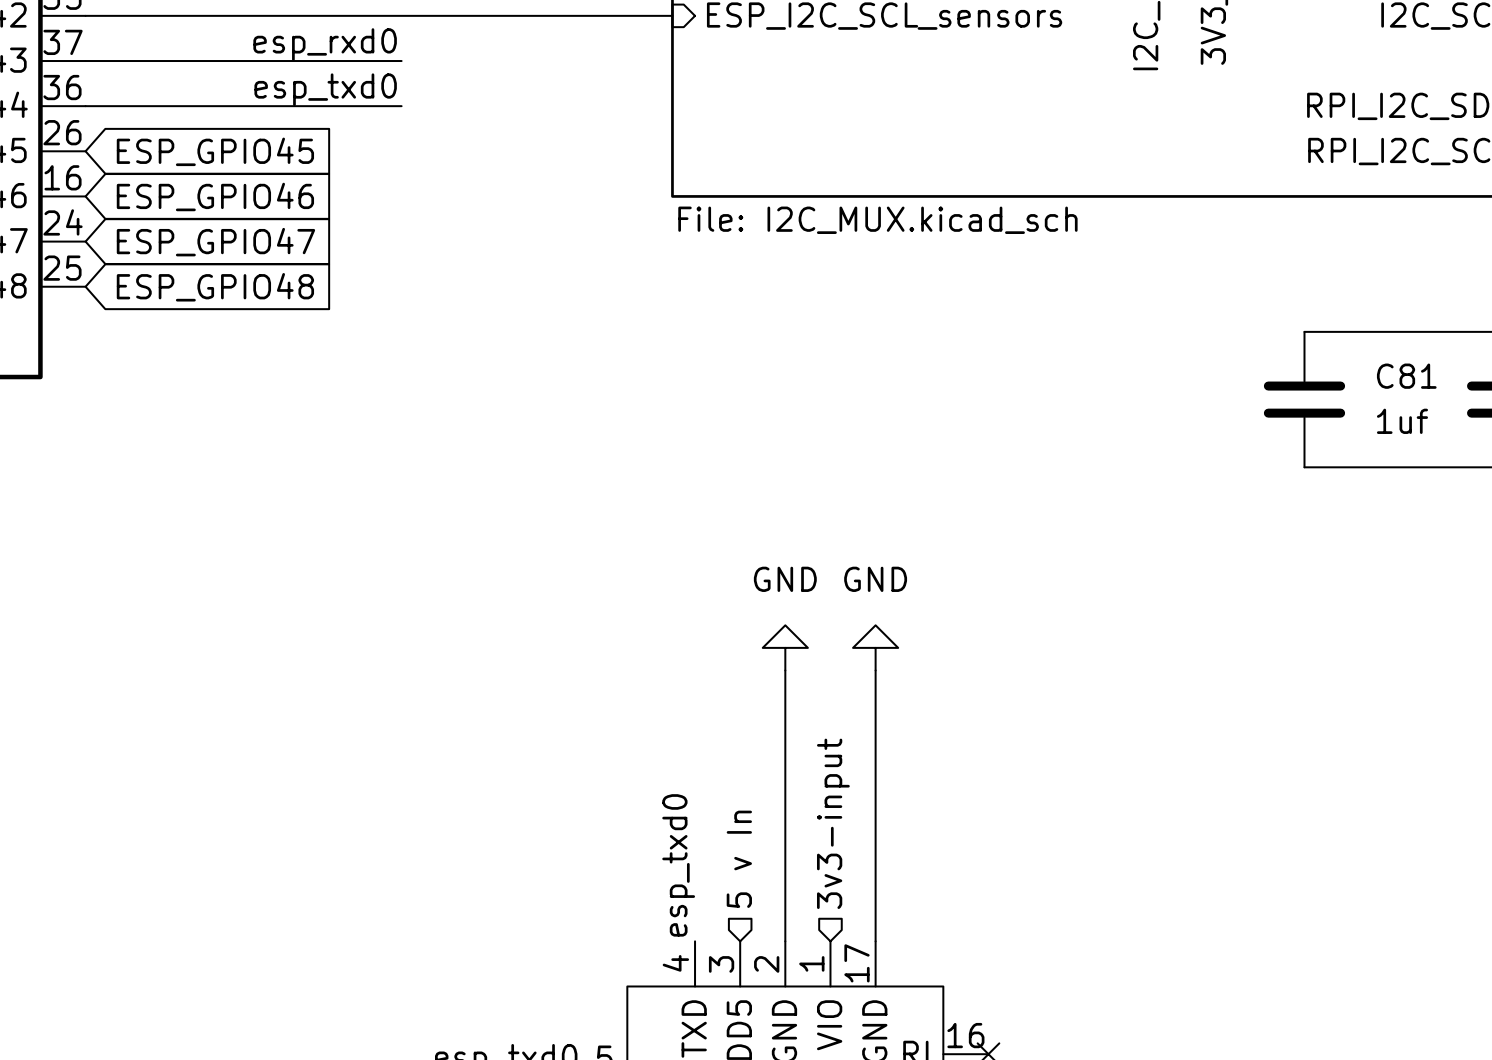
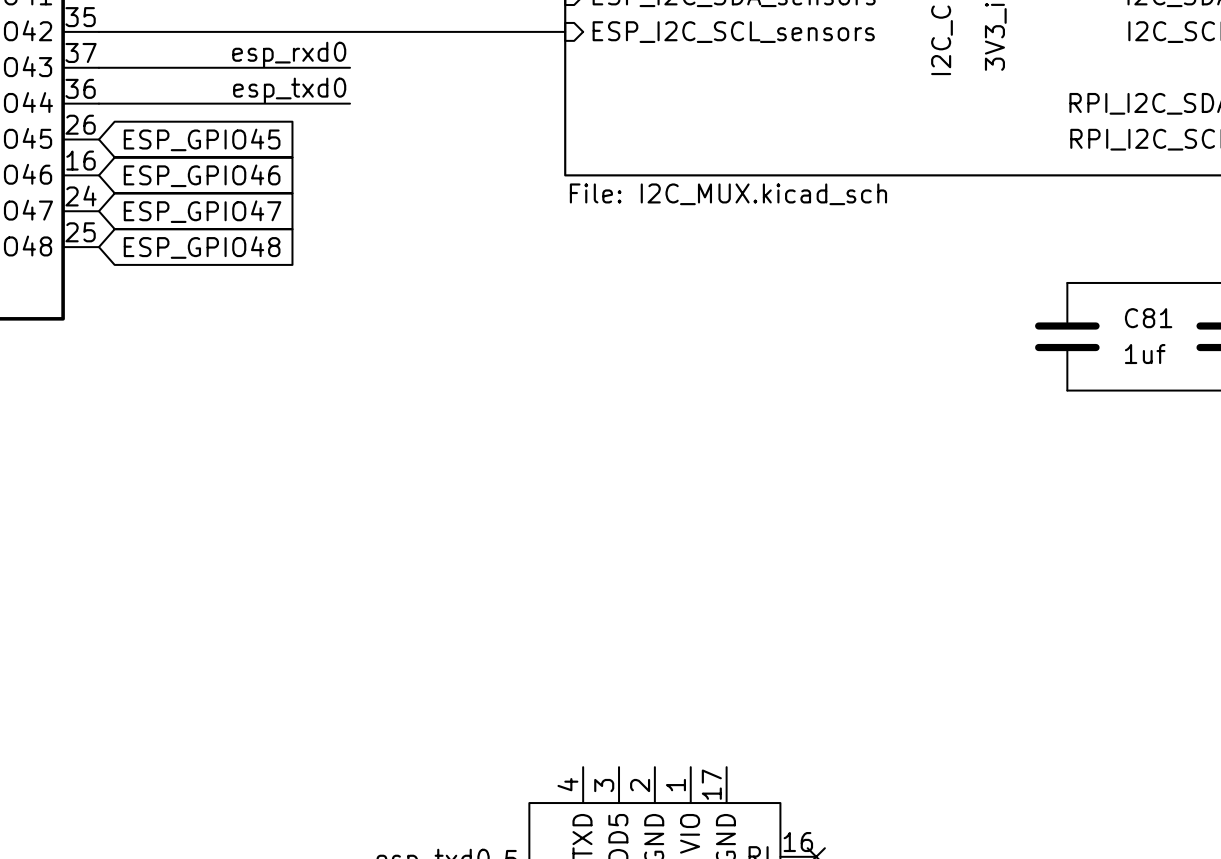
power symbol: GND (785, 647) -> none
power symbol: GND (875, 647) -> none
wire: (785, 670) (785, 941) -> none
wire: (875, 670) (875, 941) -> none
hierarchical label: 3v3-input (833, 823) -> none
hierarchical label: 5 v In (739, 859) -> none
label: esp_txd0 (678, 865) -> none

